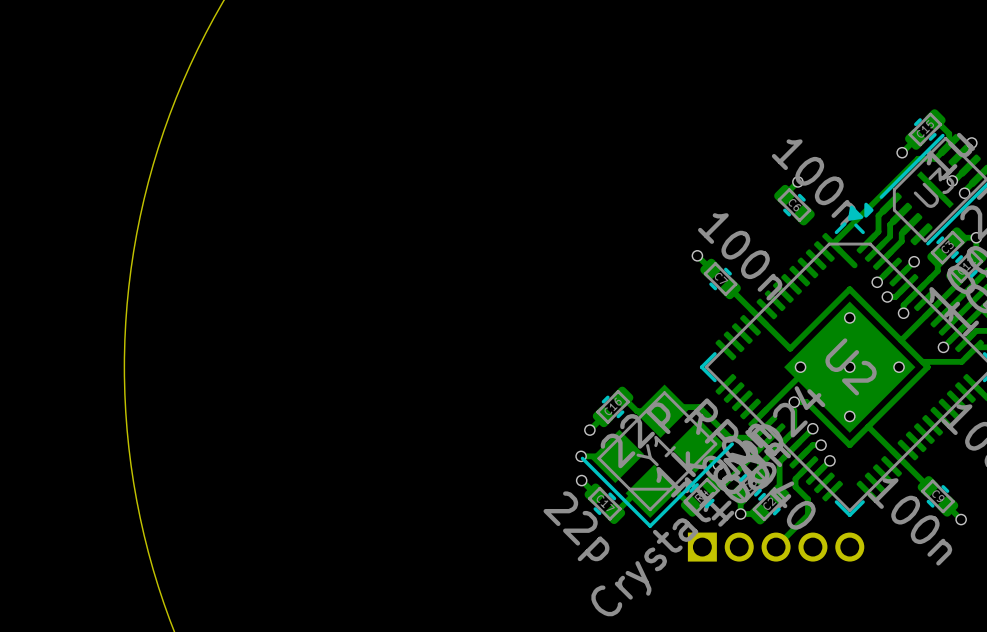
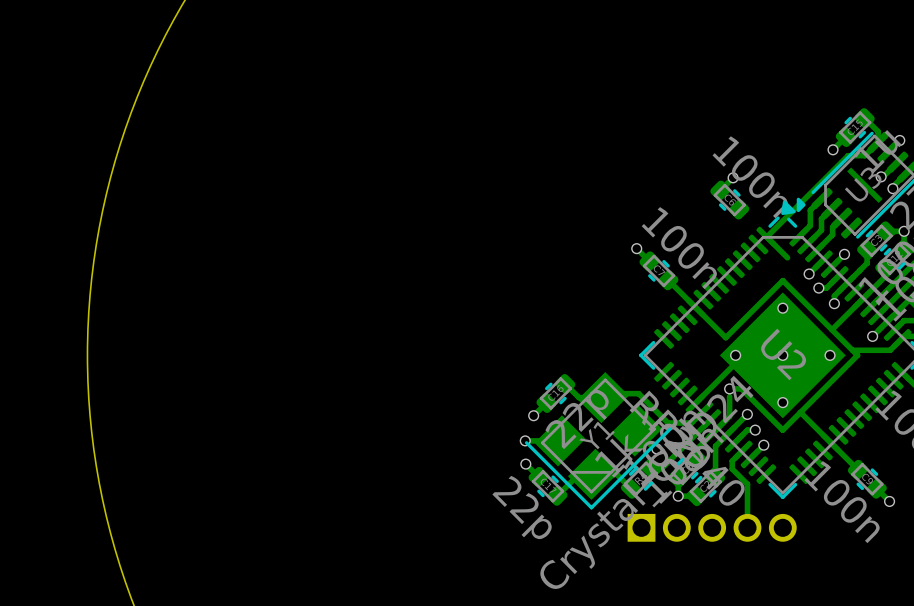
track: (797, 477) (795, 486) (807, 499) (807, 515) (776, 547) -> (732, 461) (732, 469) (747, 484) (747, 527)

